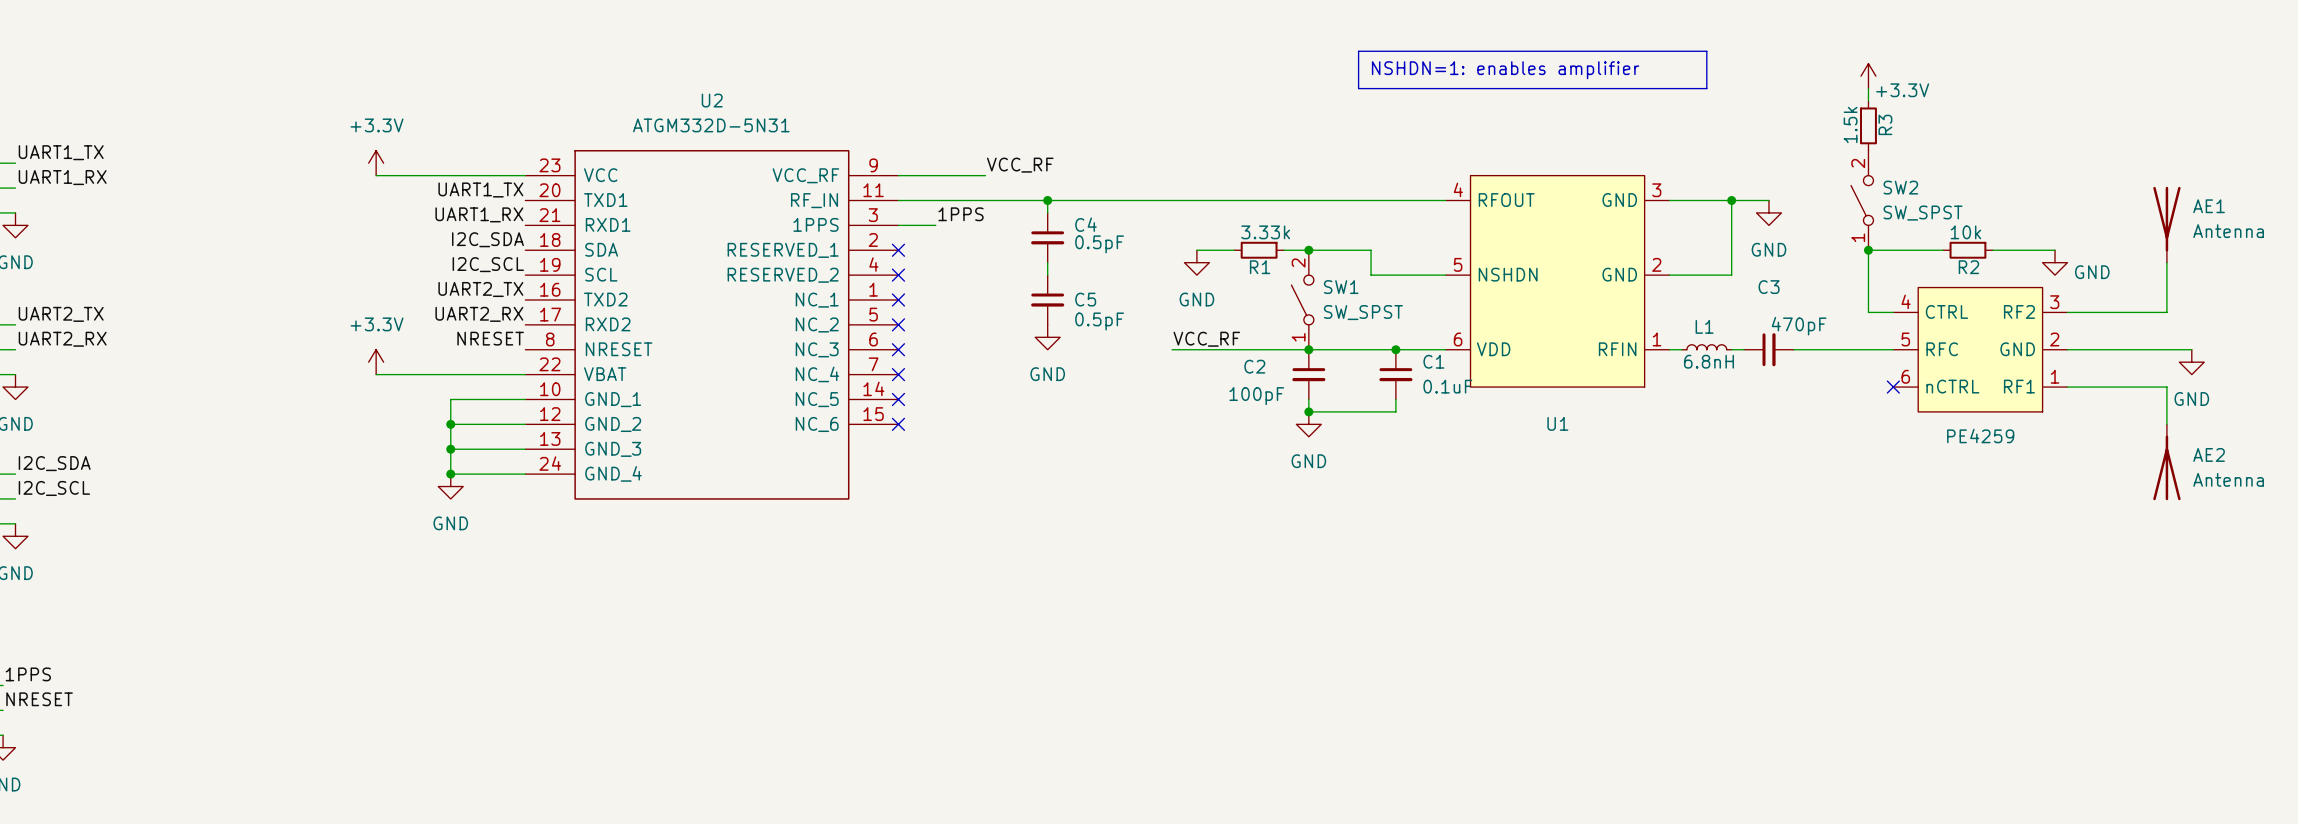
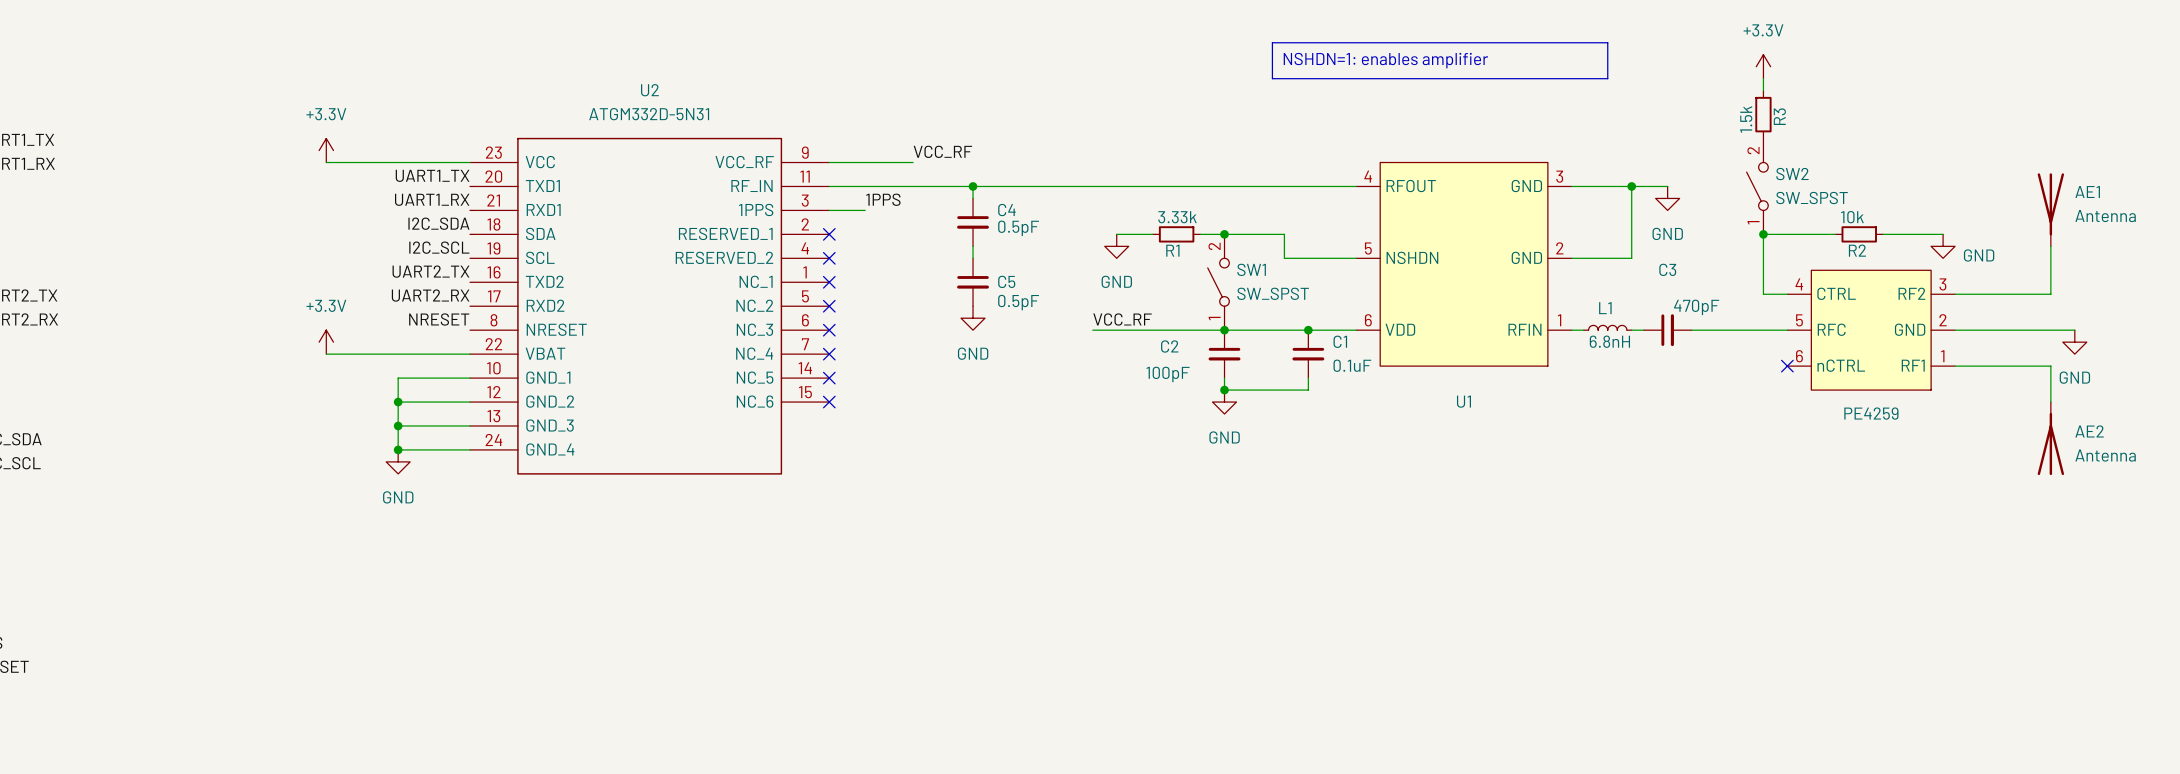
power symbol text position: +3.3V (1902, 90) -> +3.3V (1763, 30)

